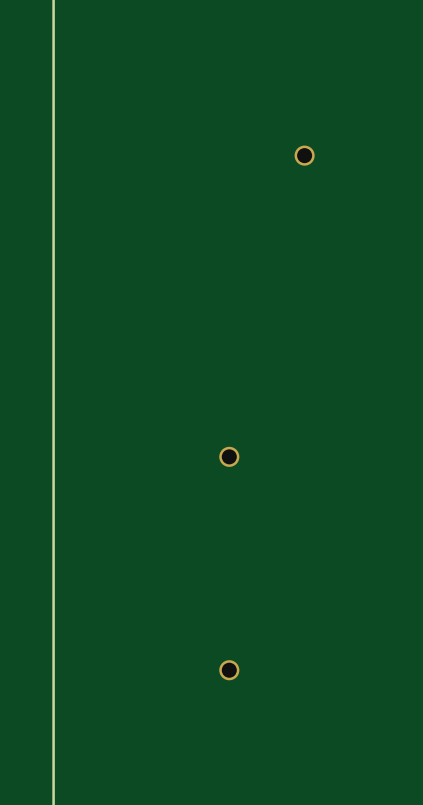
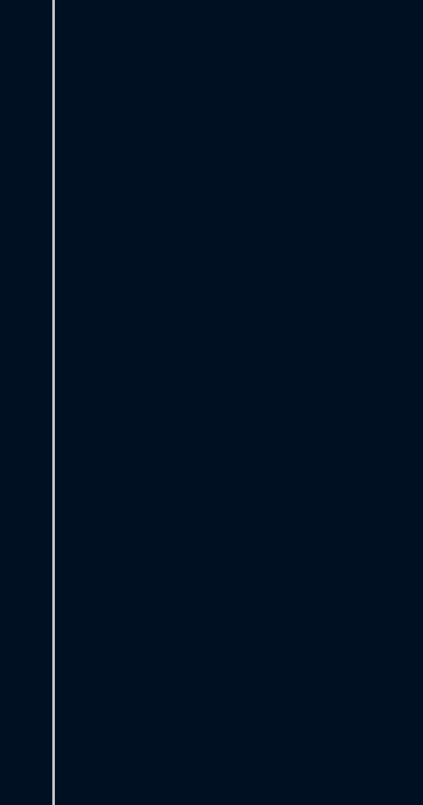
via: (304, 155) -> none
via: (229, 456) -> none
via: (229, 670) -> none

